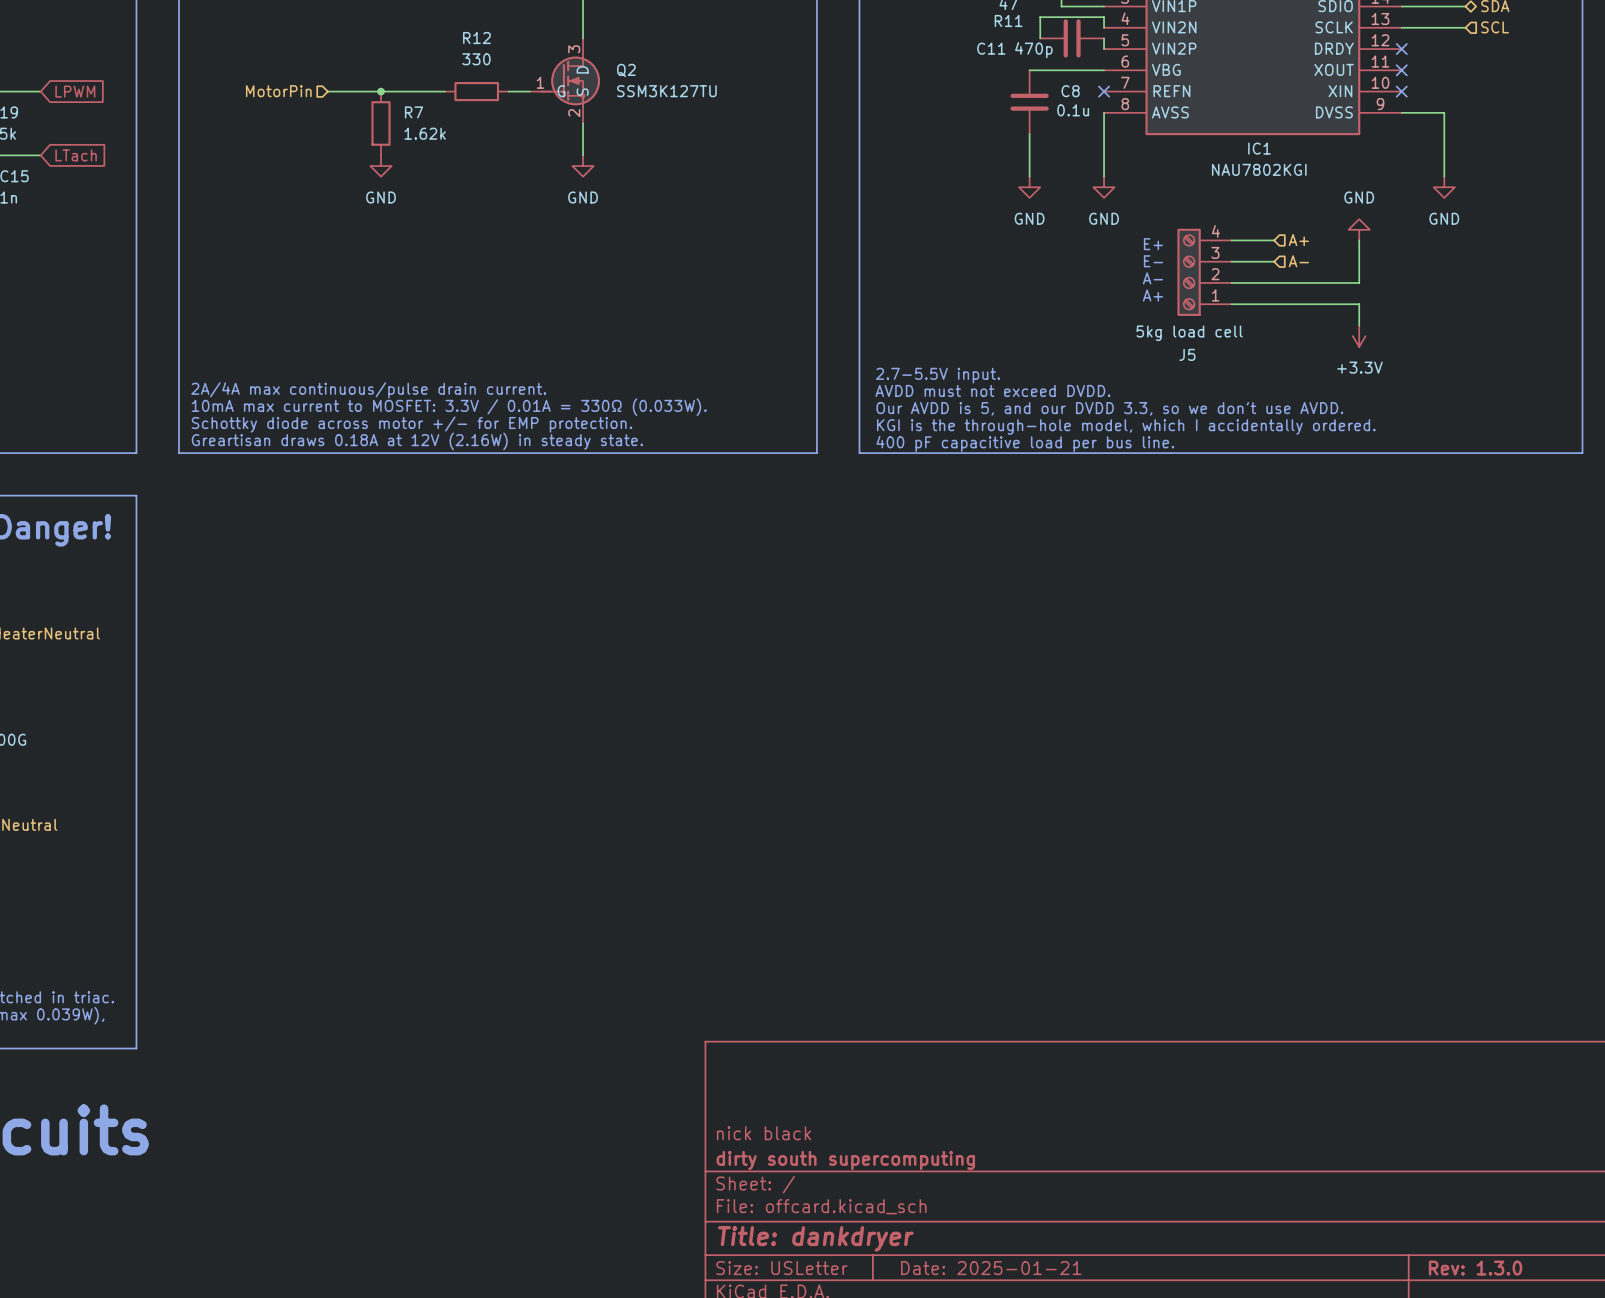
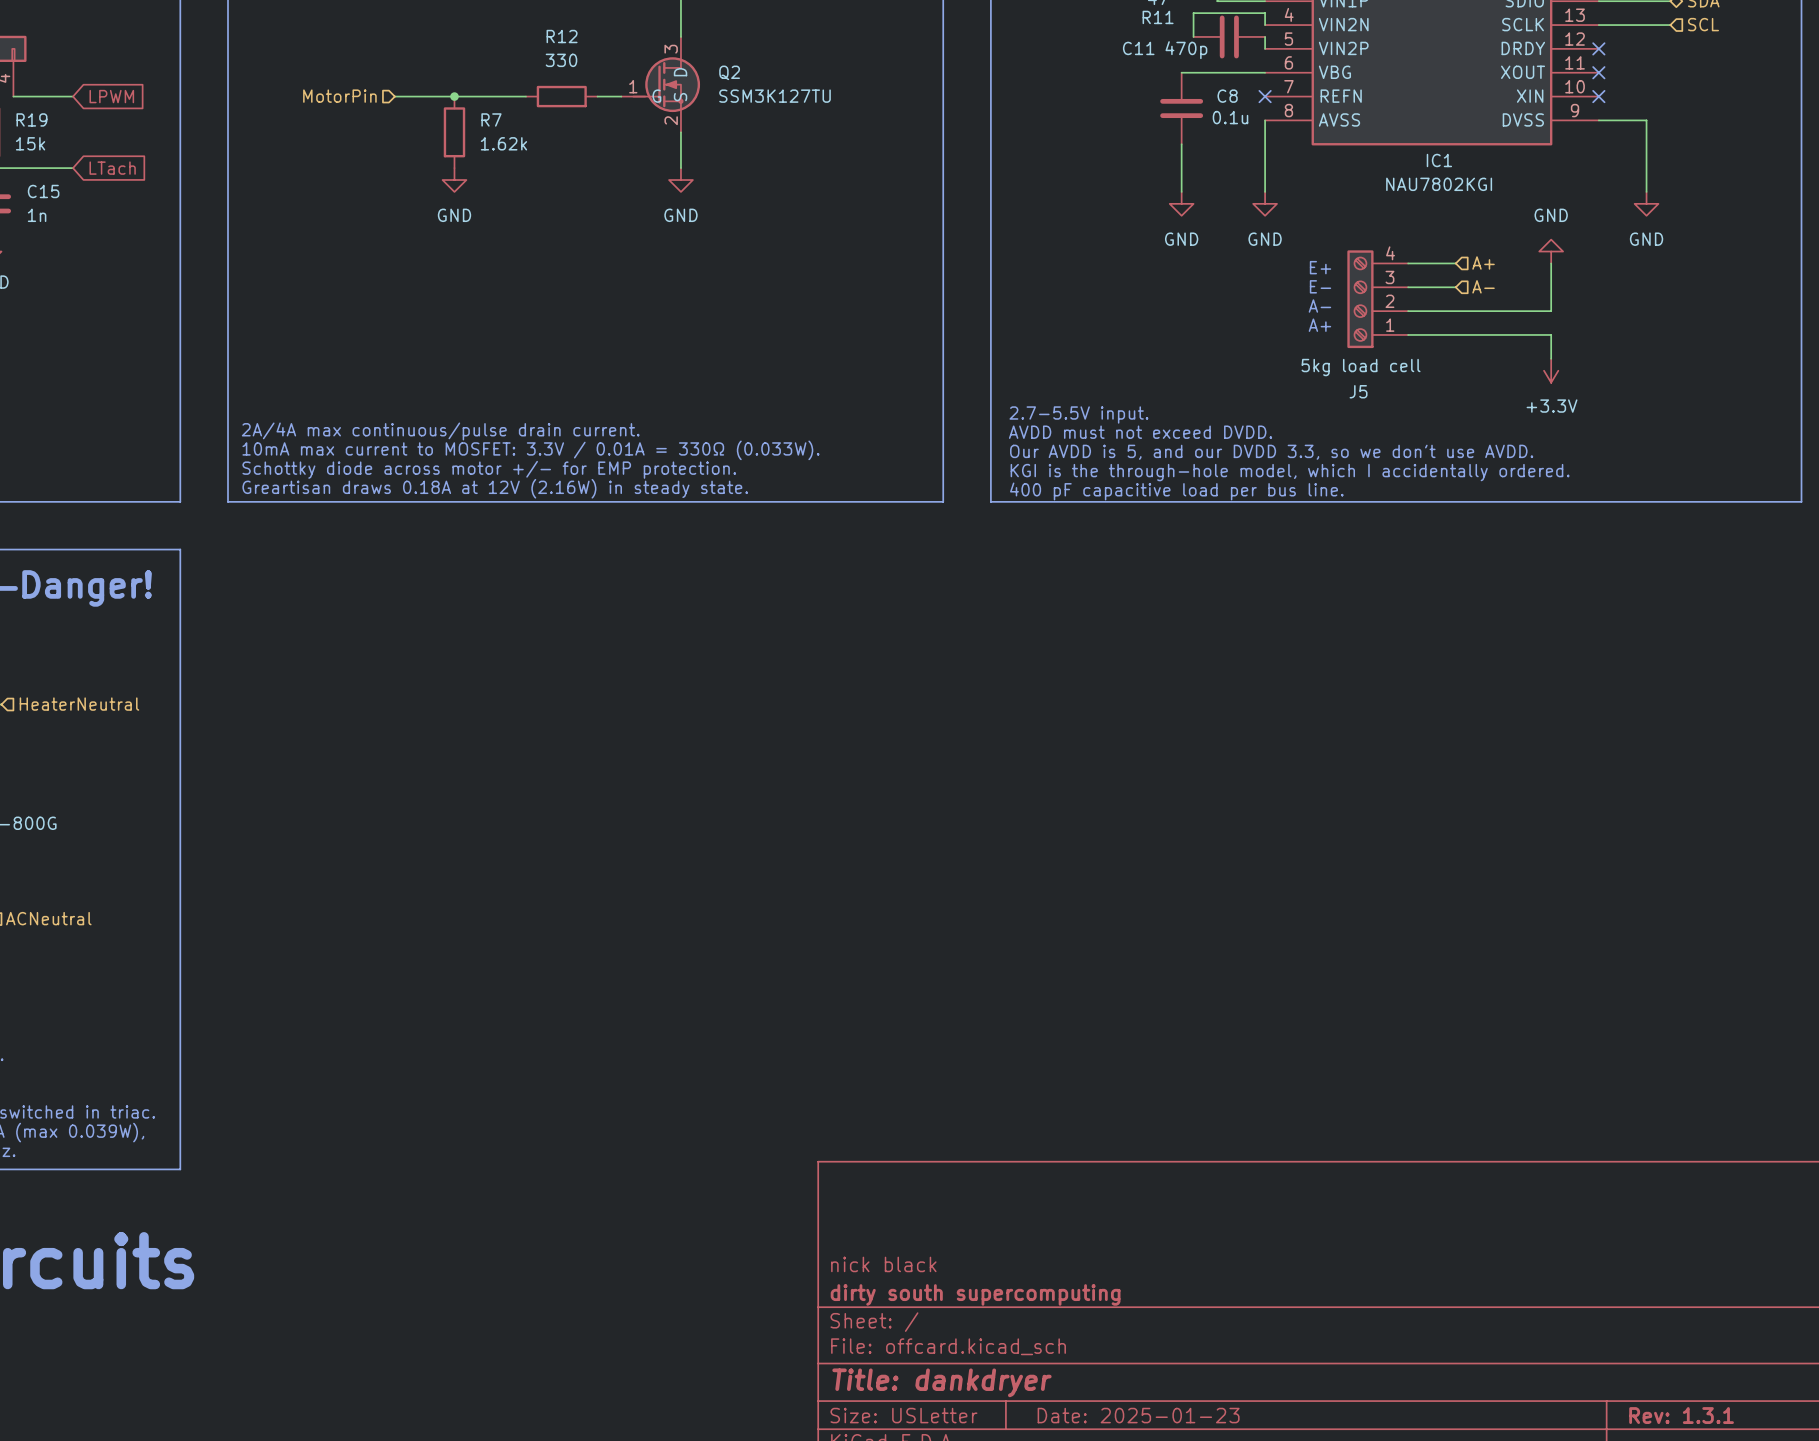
title block: Date: 2025-01-21 (991, 1268) -> Date: 2025-01-23 (1138, 1415)
title block: Rev: 1.3.0 (1475, 1268) -> Rev: 1.3.1 (1681, 1415)

